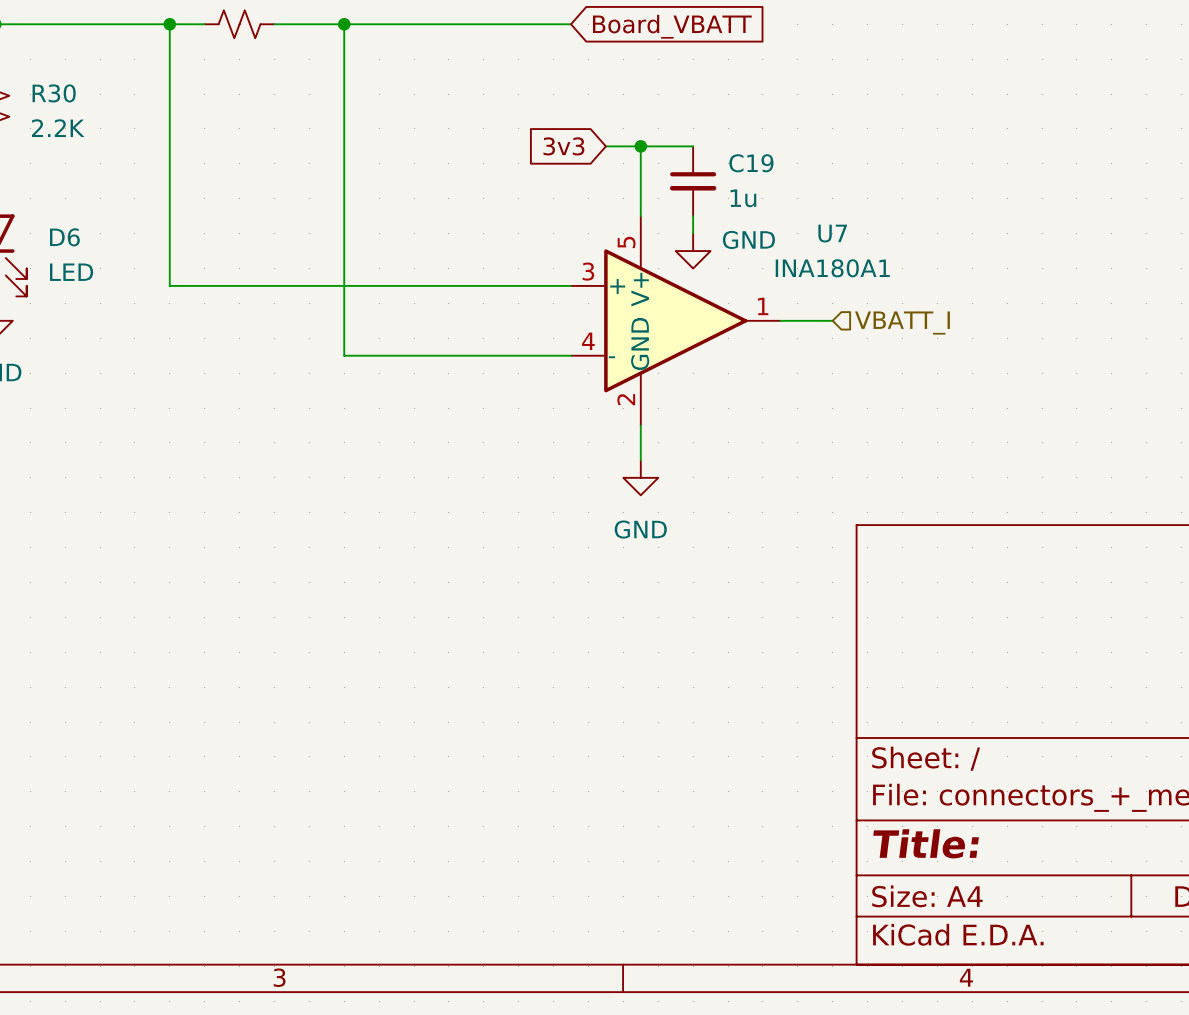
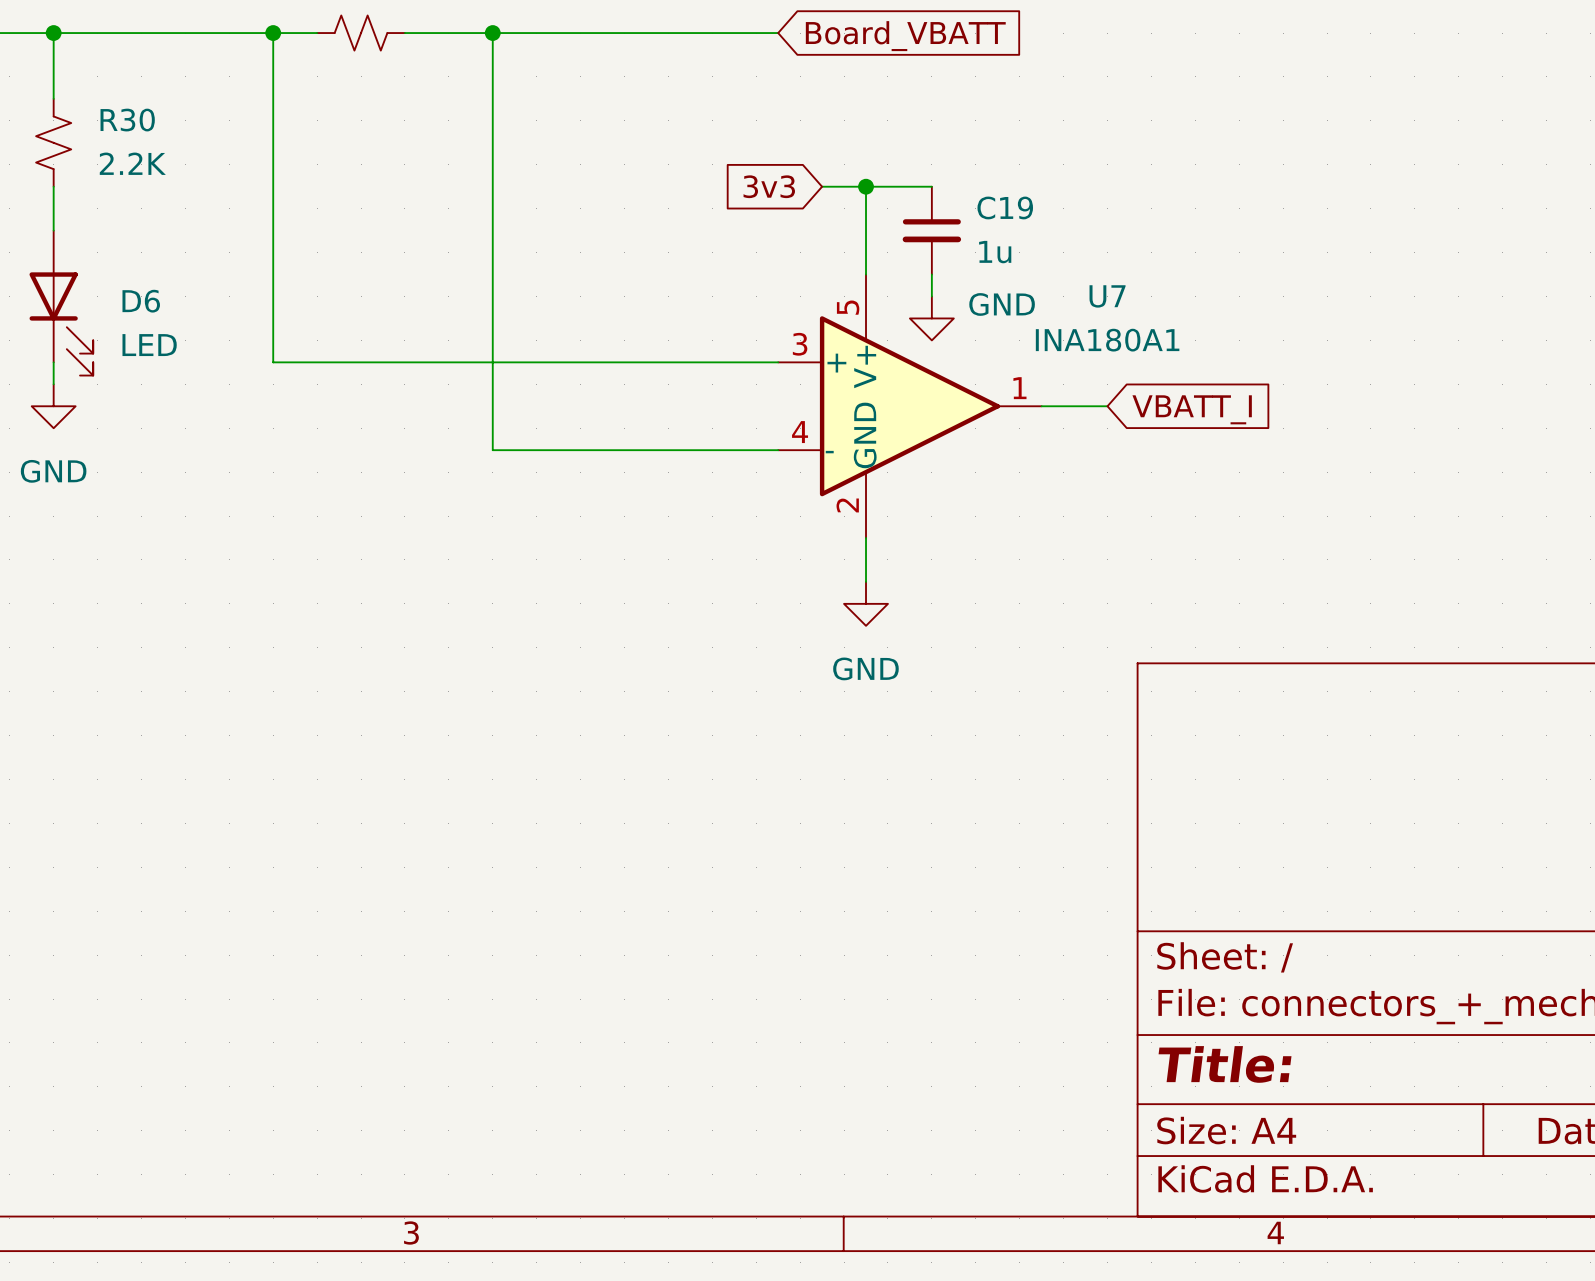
global label: none -> VBATT_I (1192, 409)
hierarchical label: VBATT_I (902, 323) -> none

